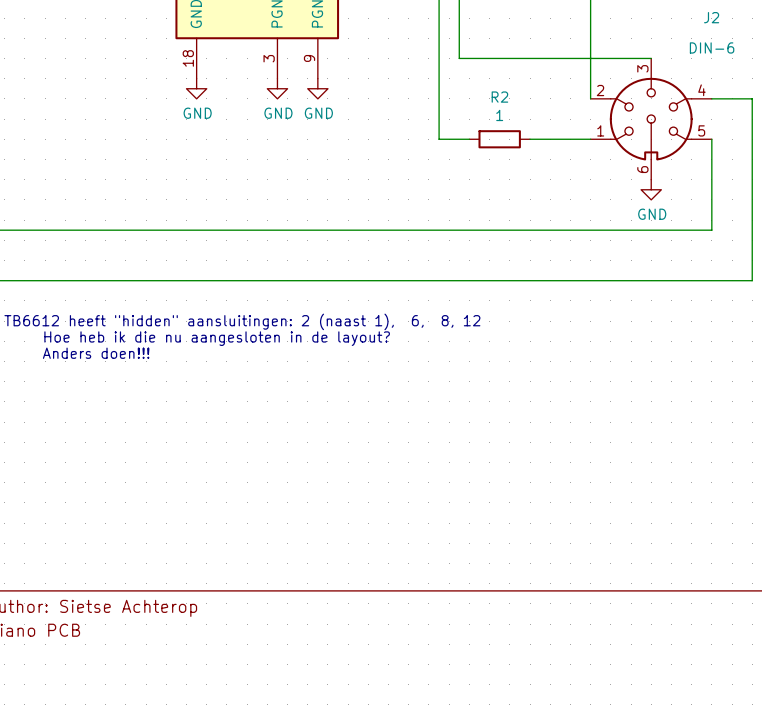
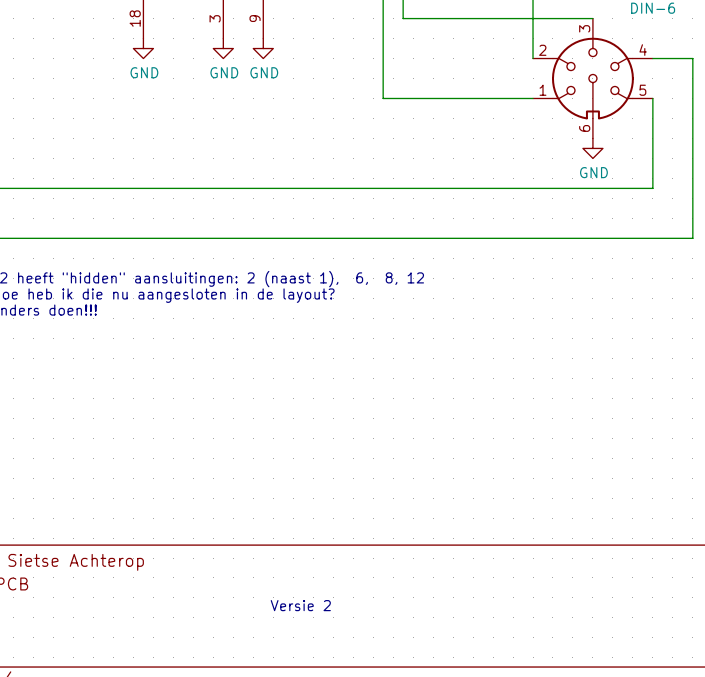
wire: none -> (413, 98) (473, 98)
R2: 1 (499, 139) -> none
text: none -> Versie 2 (300, 605)

